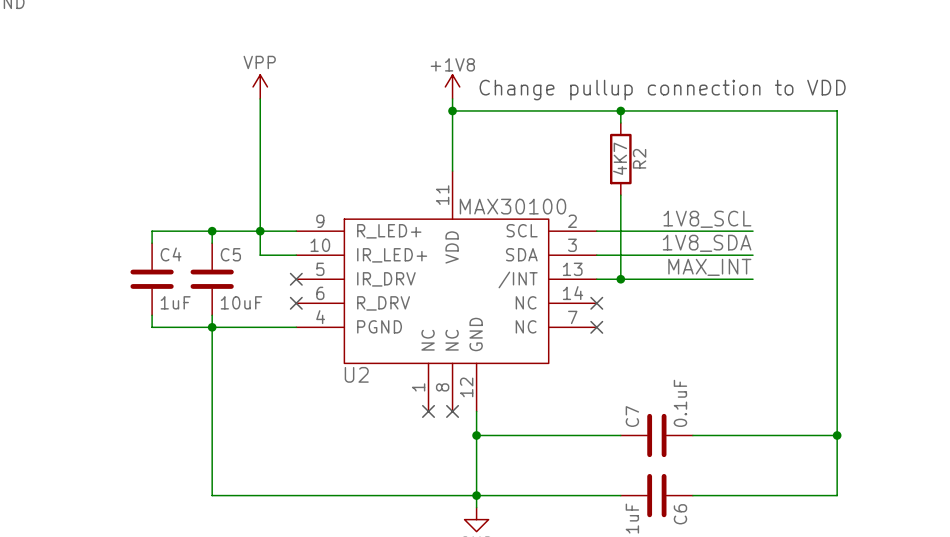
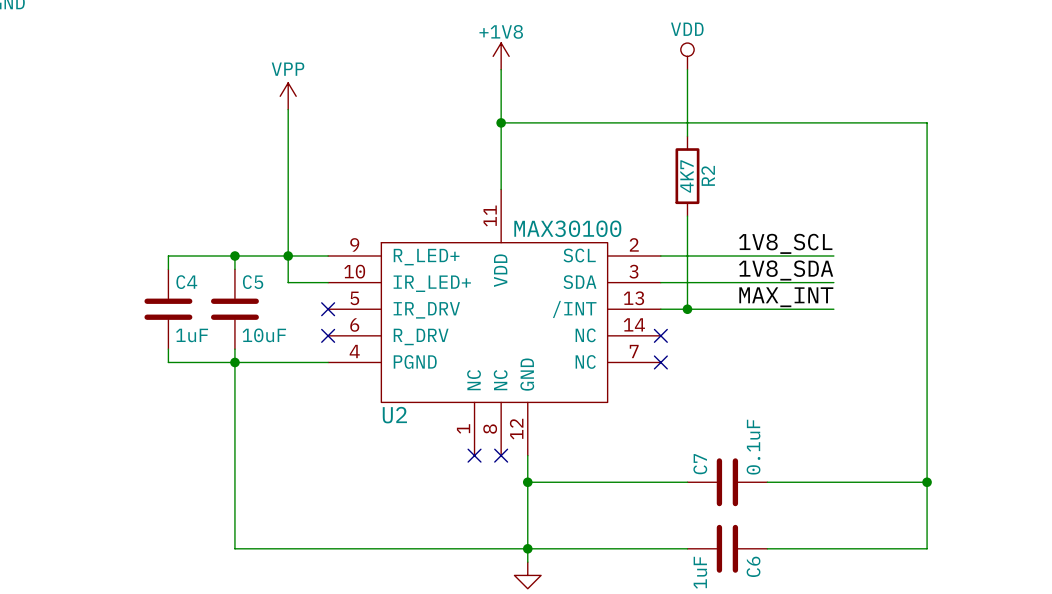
power symbol: none -> VDD (687, 56)
wire: none -> (687, 69) (687, 122)
power symbol position: +1V8 (452, 86) -> +1V8 (501, 56)
text: Change pullup connection to VDD (662, 90) -> none
junction: (620, 110) -> none

